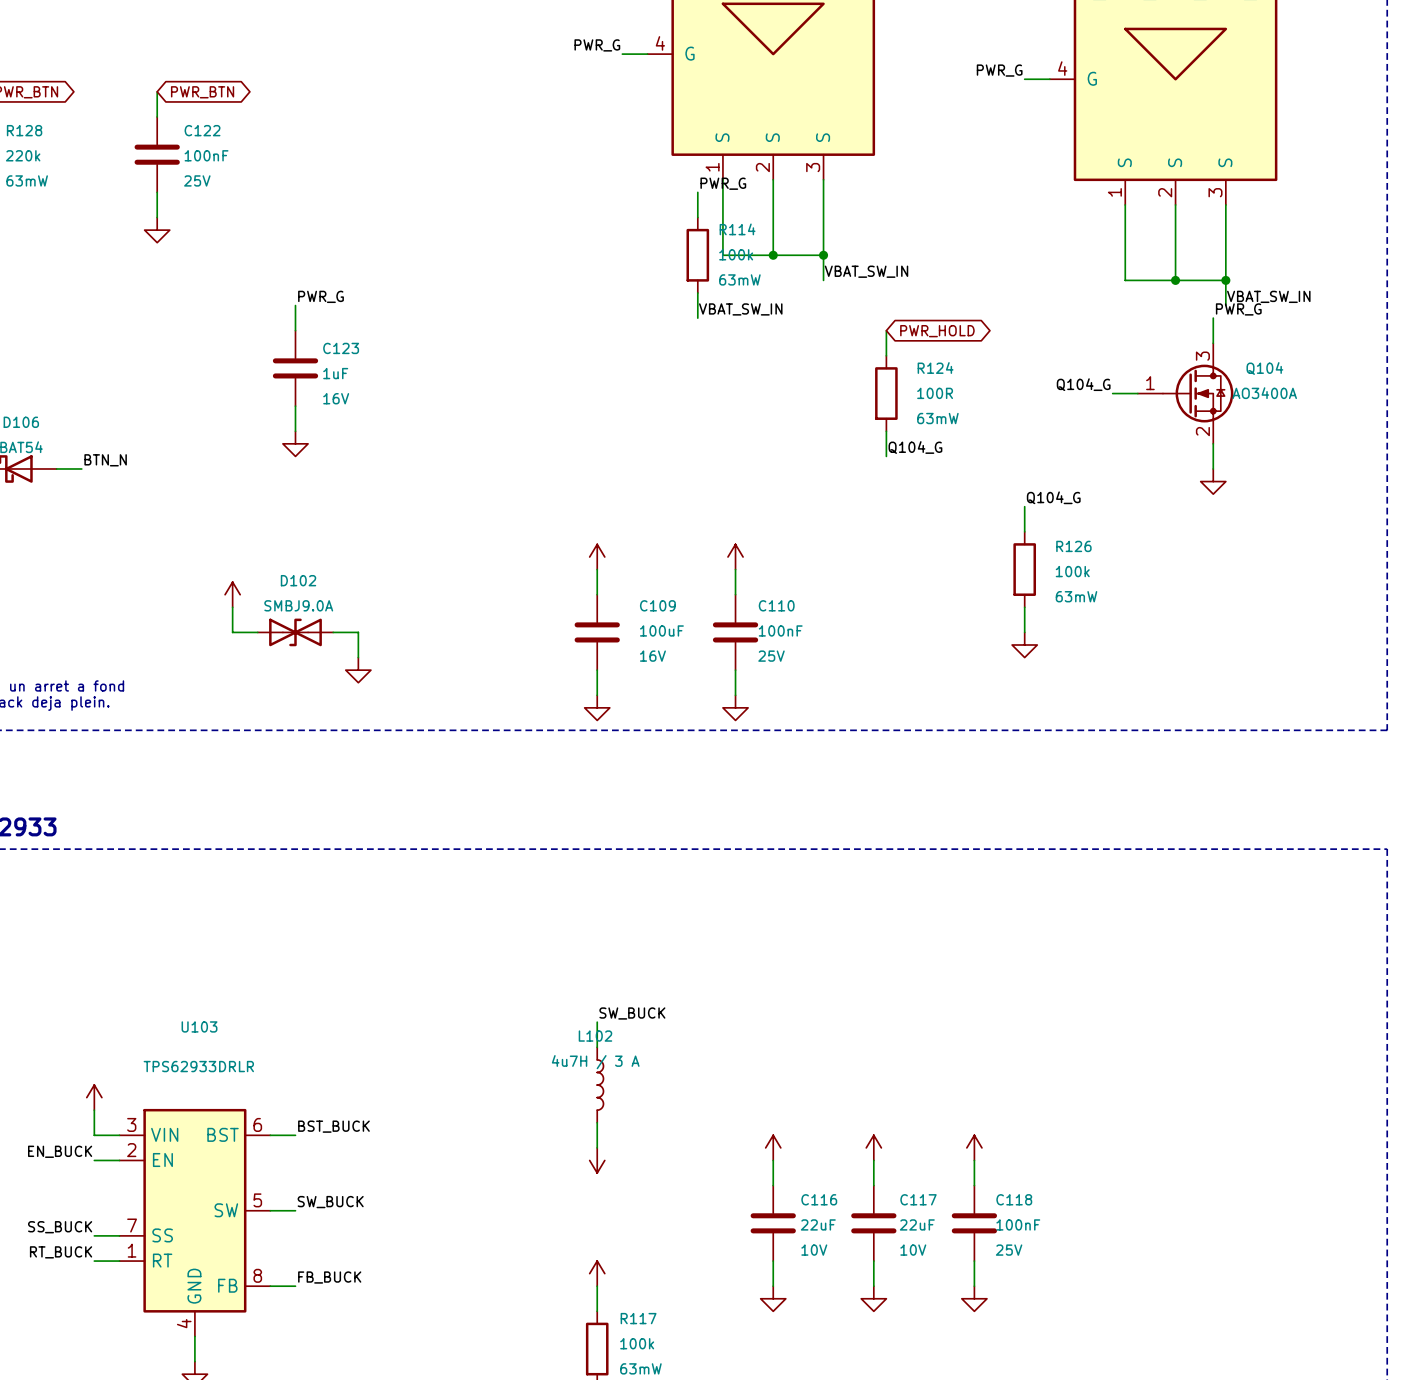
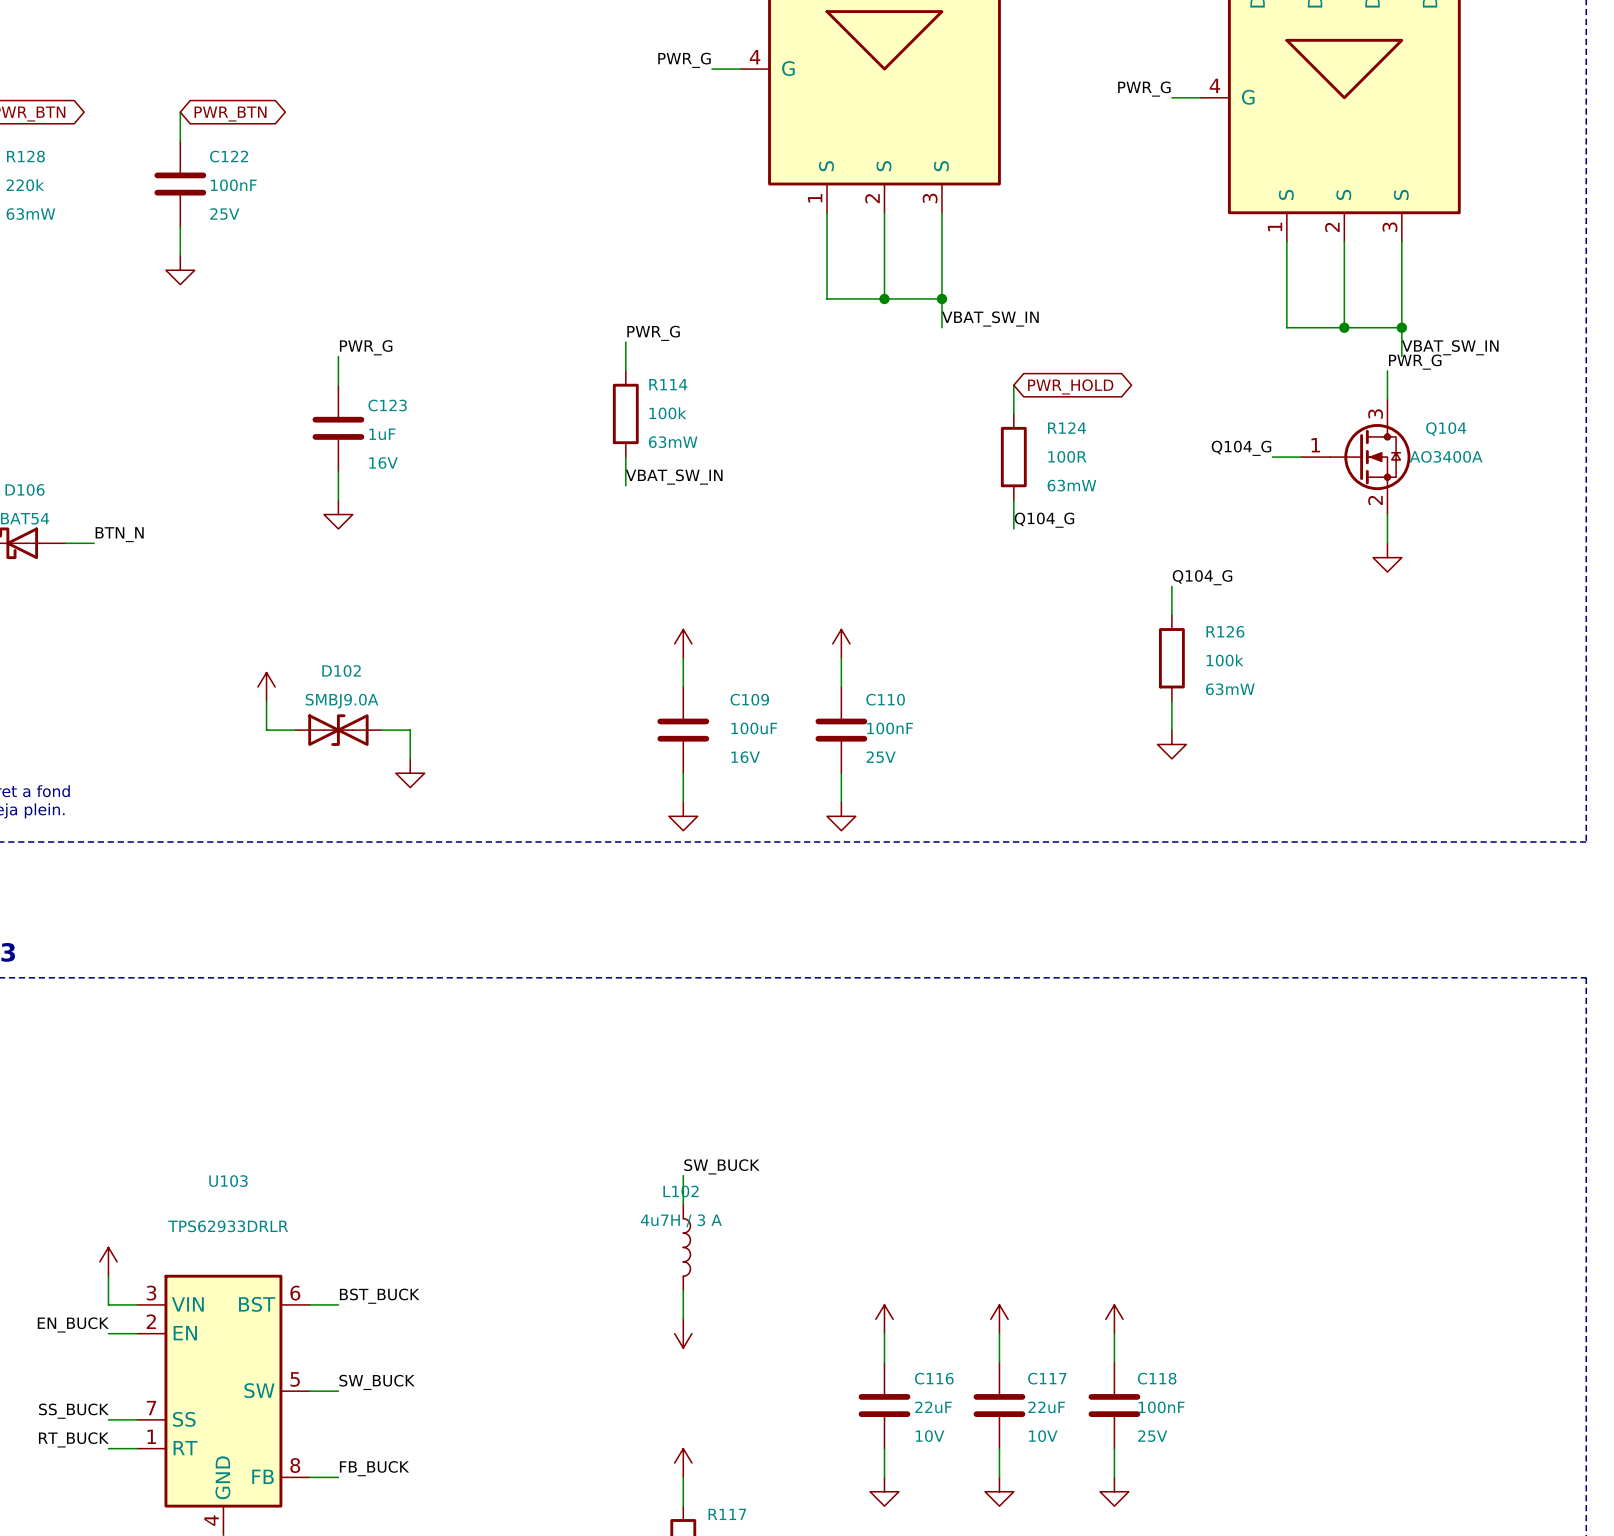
label position: PWR_G (723, 183) -> PWR_G (653, 333)
wire: (697, 192) (697, 217) -> none
R114 position: (697, 255) -> (625, 413)
wire: (697, 292) (697, 318) -> (625, 342) (625, 370)
label position: VBAT_SW_IN (740, 309) -> VBAT_SW_IN (674, 477)
wire: none -> (625, 457) (625, 485)

